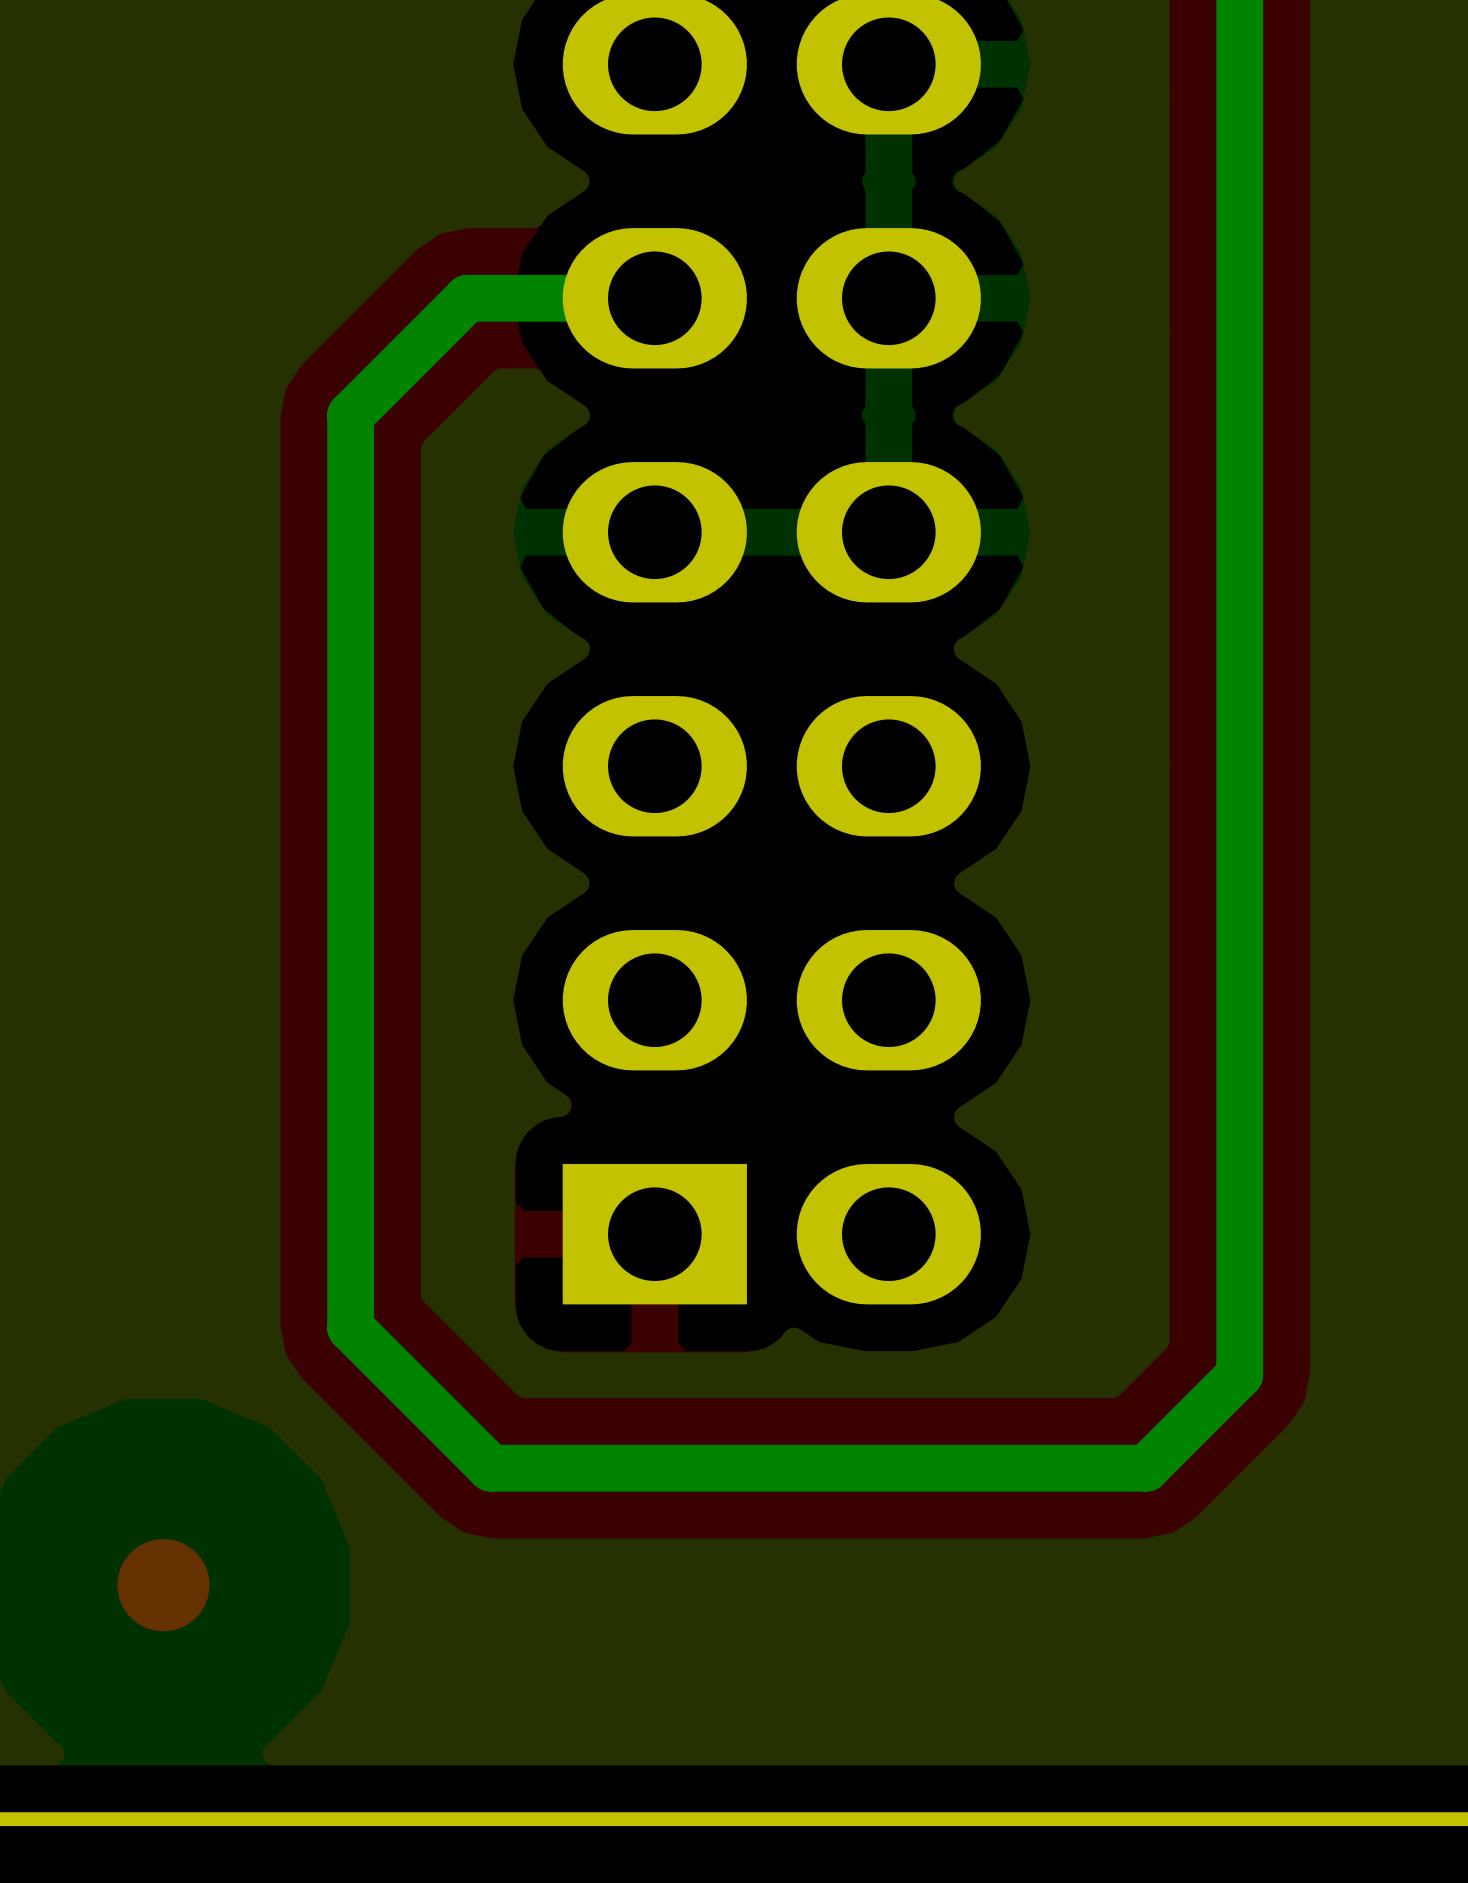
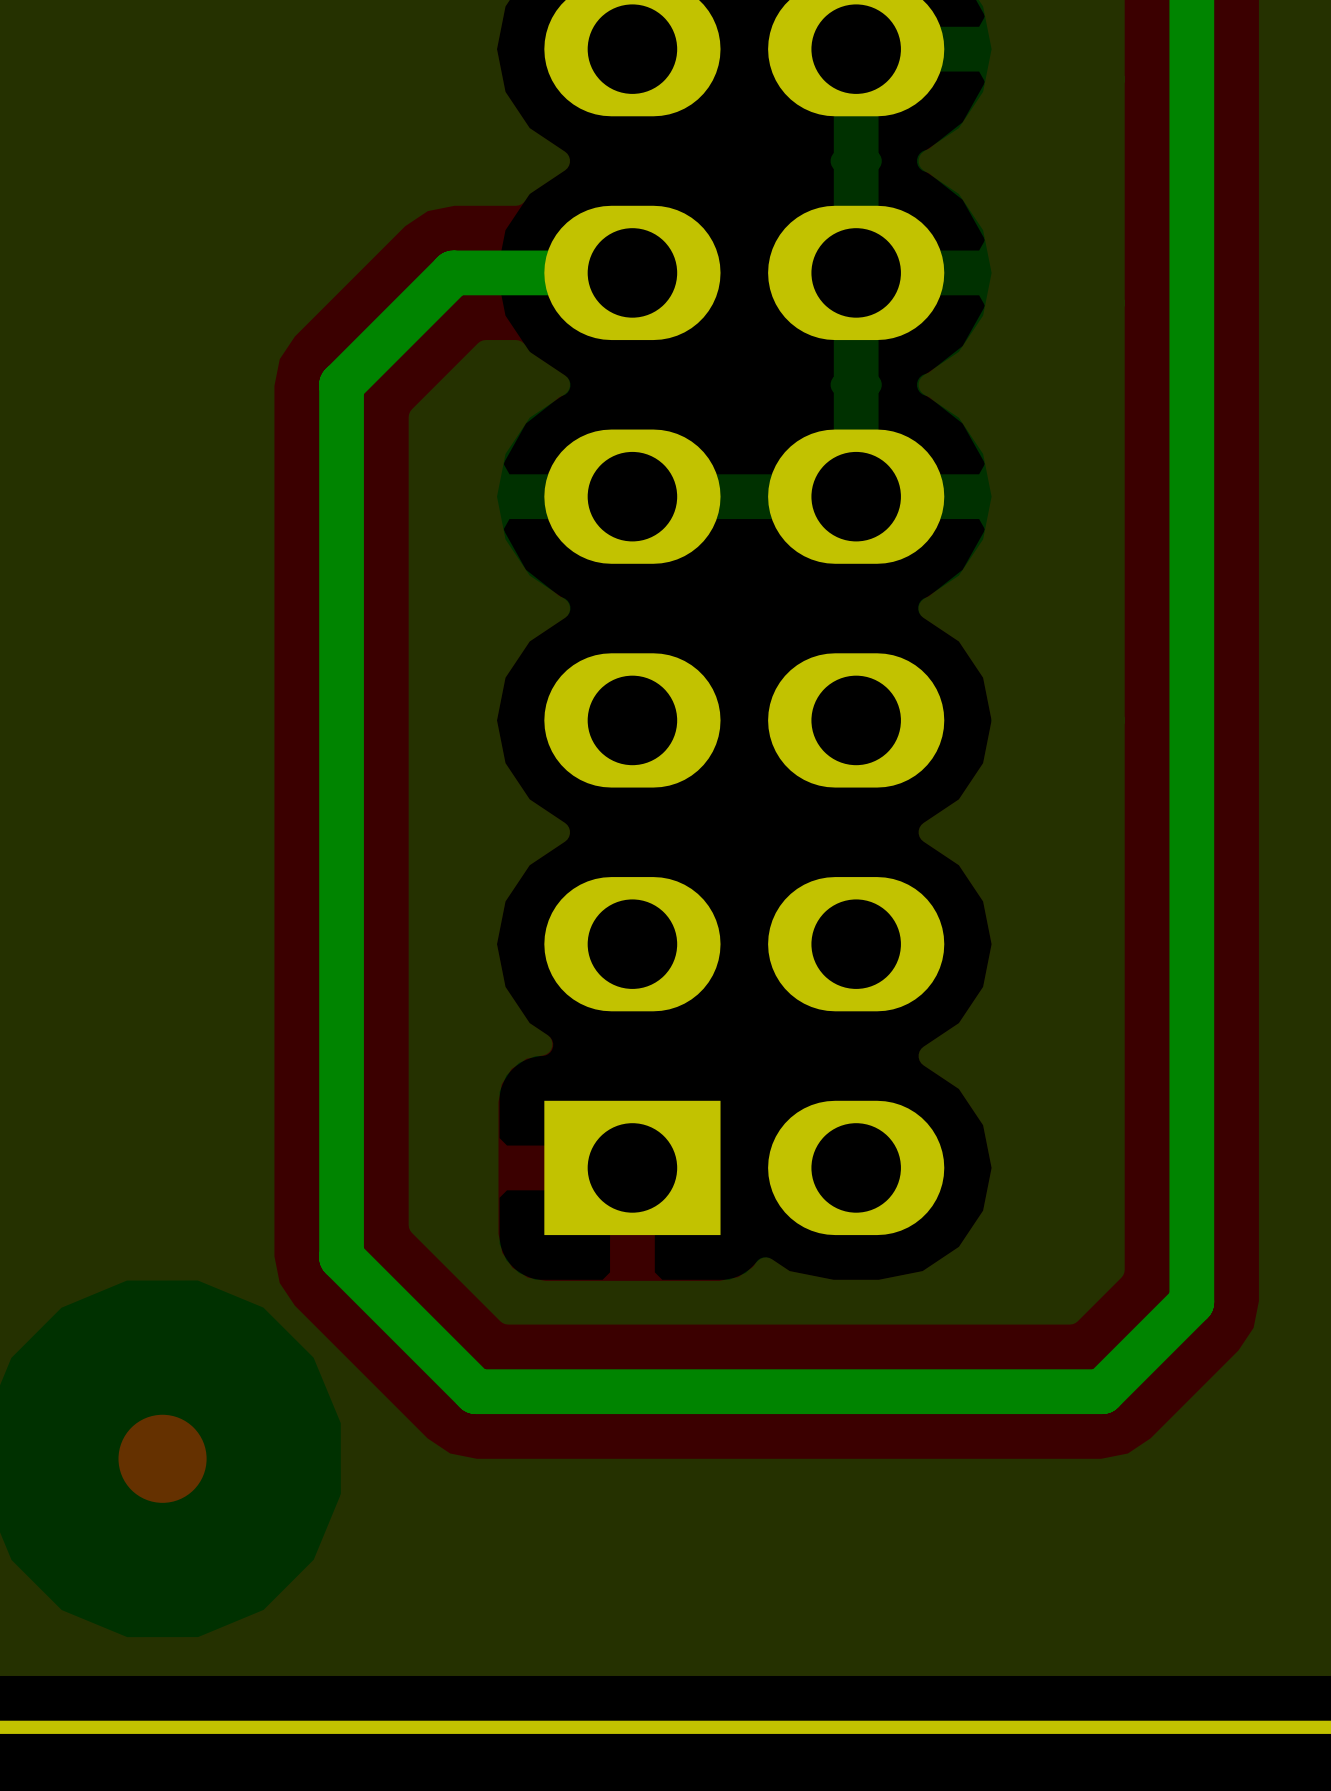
part position: (163, 1585) -> (162, 1458)

